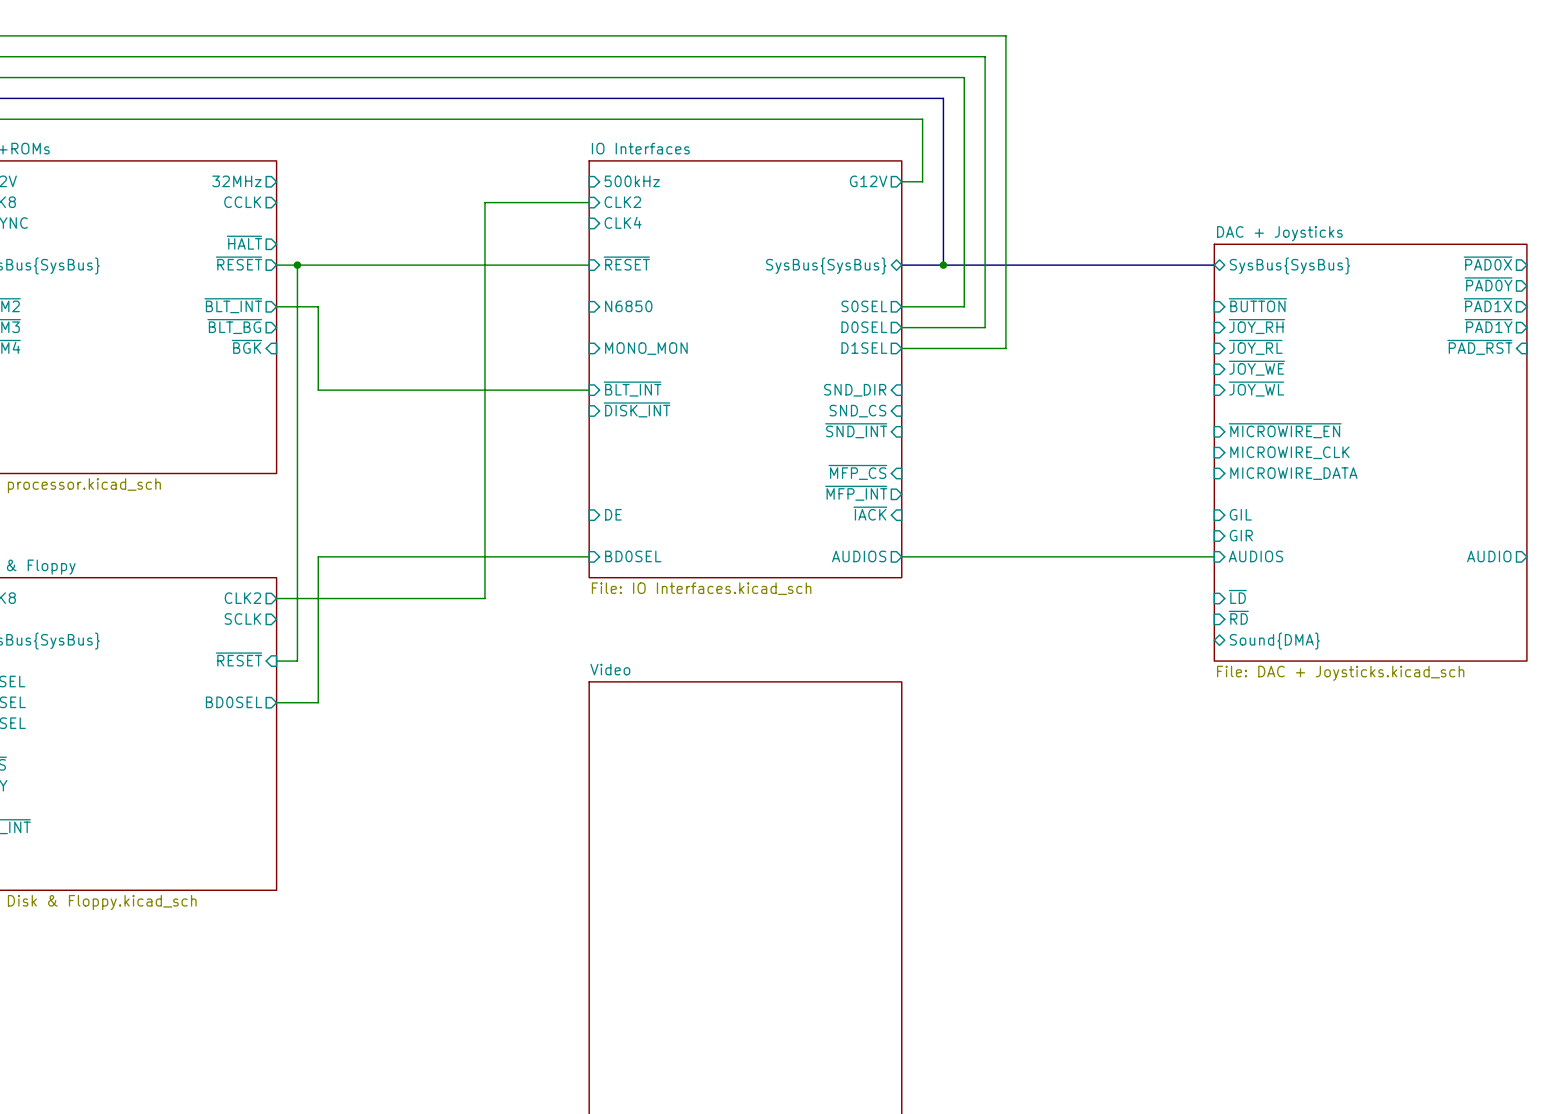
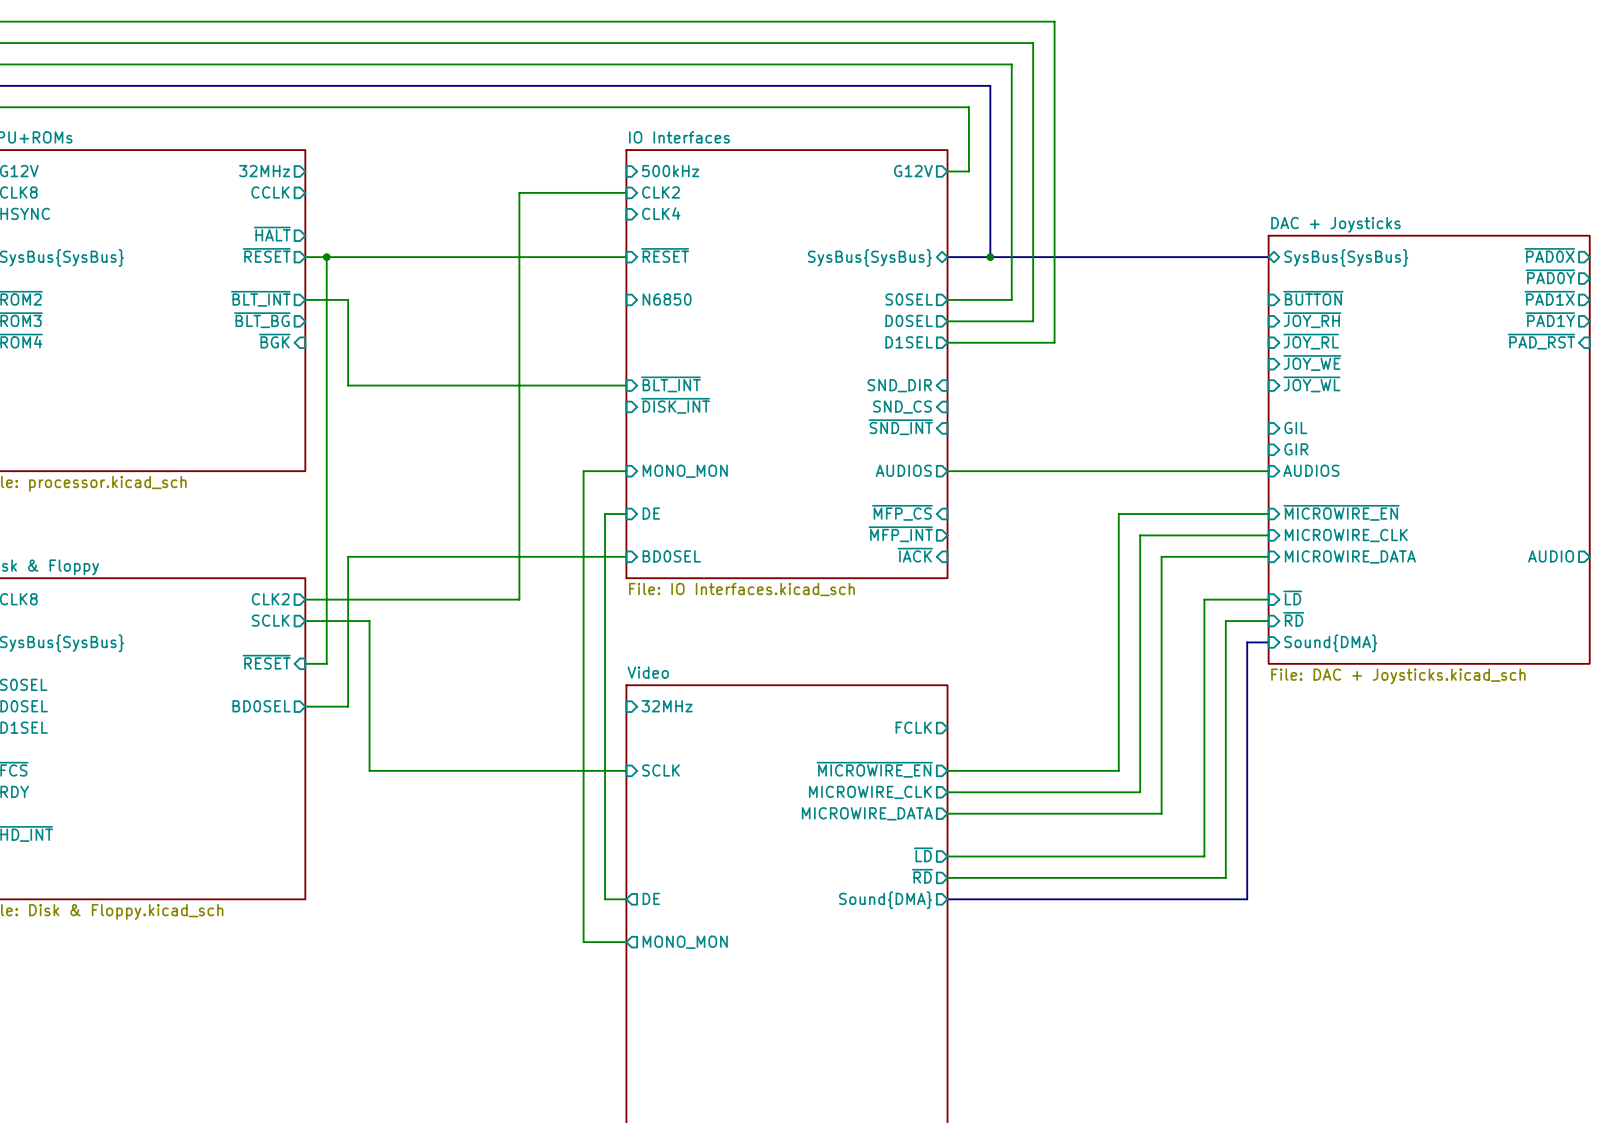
sheet pin position: MONO_MON (646, 348) -> MONO_MON (685, 471)
sheet pin: ~{MICROWIRE_EN} (1285, 430) -> GIL (1295, 427)
sheet pin: MICROWIRE_CLK (1289, 452) -> GIR (1296, 449)
sheet pin shape: input (857, 472) -> output (903, 470)
sheet pin: ~{MFP_CS} (857, 472) -> AUDIOS (903, 470)
wire: none -> (626, 471) (583, 471) (583, 942) (626, 942)
wire: none -> (947, 471) (1268, 471)
sheet pin: MICROWIRE_DATA (1293, 473) -> AUDIOS (1311, 470)
sheet pin position: ~{MFP_INT} (856, 493) -> ~{MFP_INT} (900, 534)
sheet pin: ~{IACK} (870, 513) -> ~{MFP_CS} (902, 512)
sheet pin: GIL (1240, 514) -> ~{MICROWIRE_EN} (1341, 512)
wire: none -> (626, 514) (605, 514) (605, 899) (626, 899)
wire: none -> (1268, 514) (1118, 514) (1118, 770) (947, 770)
sheet pin: GIR (1241, 535) -> MICROWIRE_CLK (1346, 535)
wire: none -> (1268, 535) (1140, 535) (1140, 792) (947, 792)
sheet pin shape: output (859, 556) -> input (915, 555)
sheet pin: AUDIOS (859, 556) -> ~{IACK} (915, 555)
wire: (901, 556) (1110, 556) -> (947, 813) (1161, 813) (1161, 556)
sheet pin: AUDIOS (1255, 556) -> MICROWIRE_DATA (1350, 556)
wire: none -> (1268, 599) (1204, 599) (1204, 856) (947, 856)
wire: none -> (305, 621) (369, 621) (369, 770) (626, 770)
wire: none -> (1268, 621) (1225, 621) (1225, 877) (947, 877)
bus: none -> (1268, 642) (1247, 642) (1247, 899) (947, 899)
sheet pin shape: bidirectional (1274, 641) -> input (1330, 643)
sheet pin: none -> 32MHz (667, 706)
sheet pin: none -> FCLK (913, 727)
sheet pin: none -> SCLK (660, 770)
sheet pin: none -> ~{MICROWIRE_EN} (874, 769)
sheet pin: none -> MICROWIRE_CLK (870, 792)
sheet pin: none -> MICROWIRE_DATA (867, 813)
sheet pin: none -> ~{LD} (923, 854)
sheet pin: none -> ~{RD} (922, 876)
sheet pin: none -> DE (651, 898)
sheet pin: none -> Sound{DMA} (885, 900)
sheet pin: none -> MONO_MON (685, 942)

